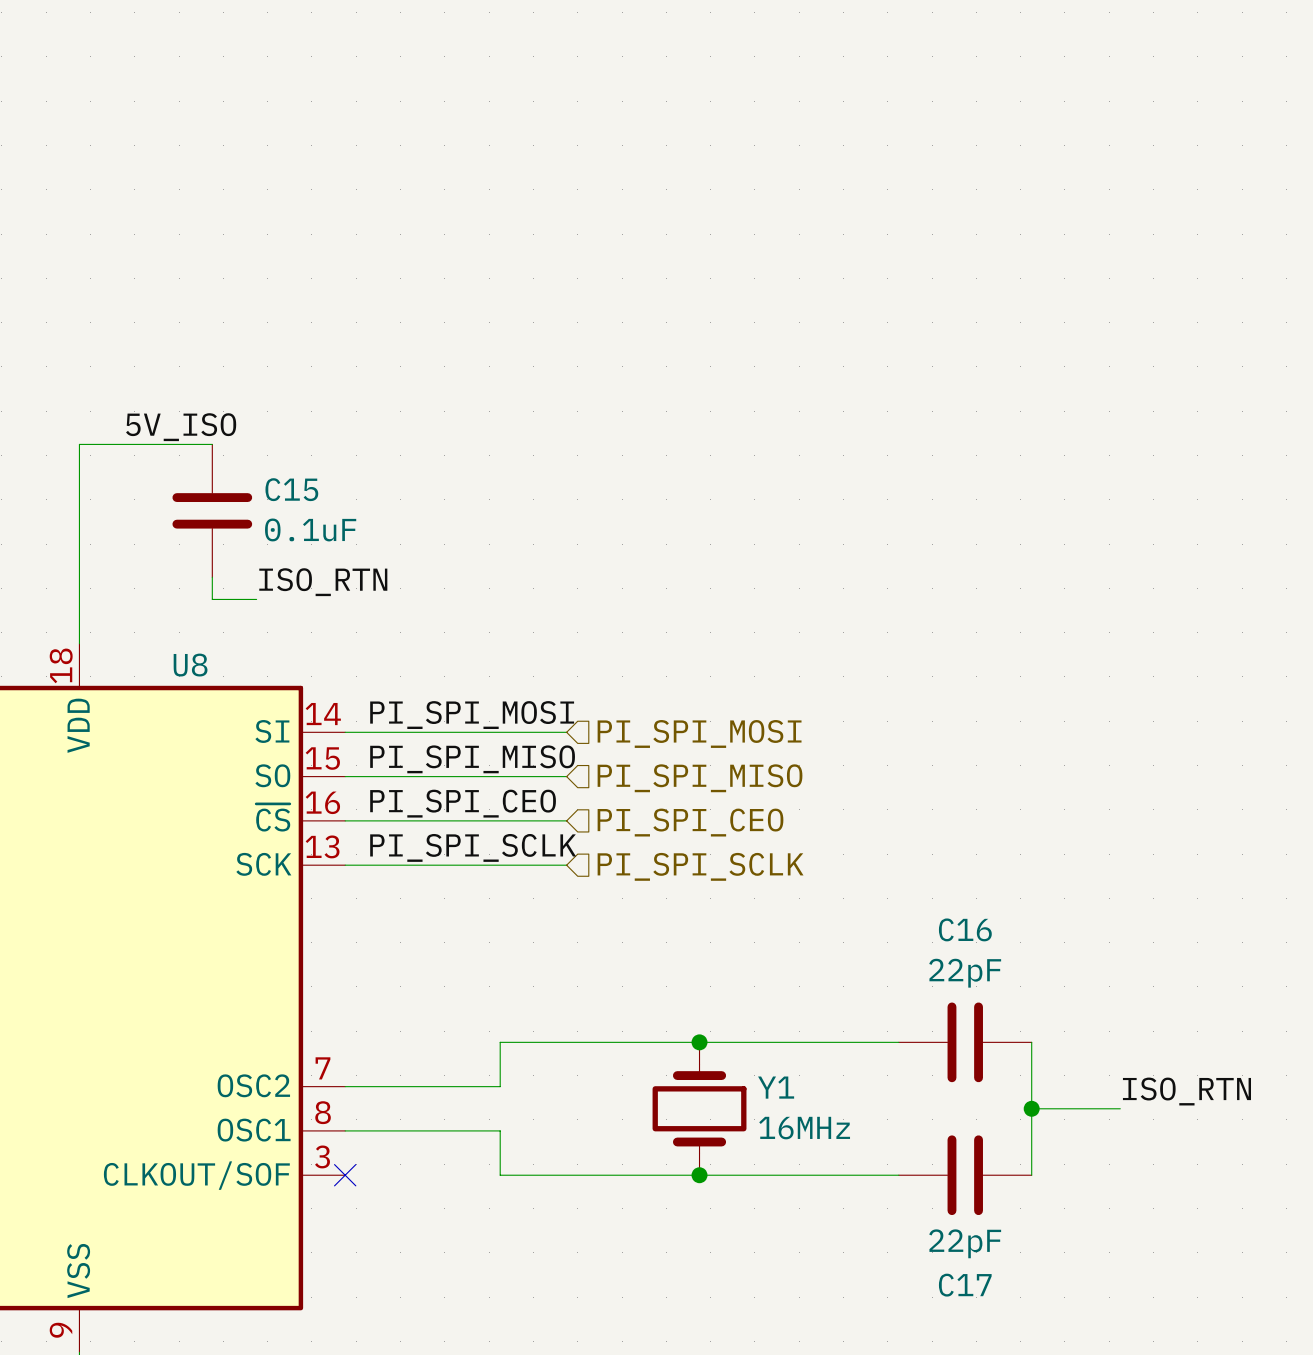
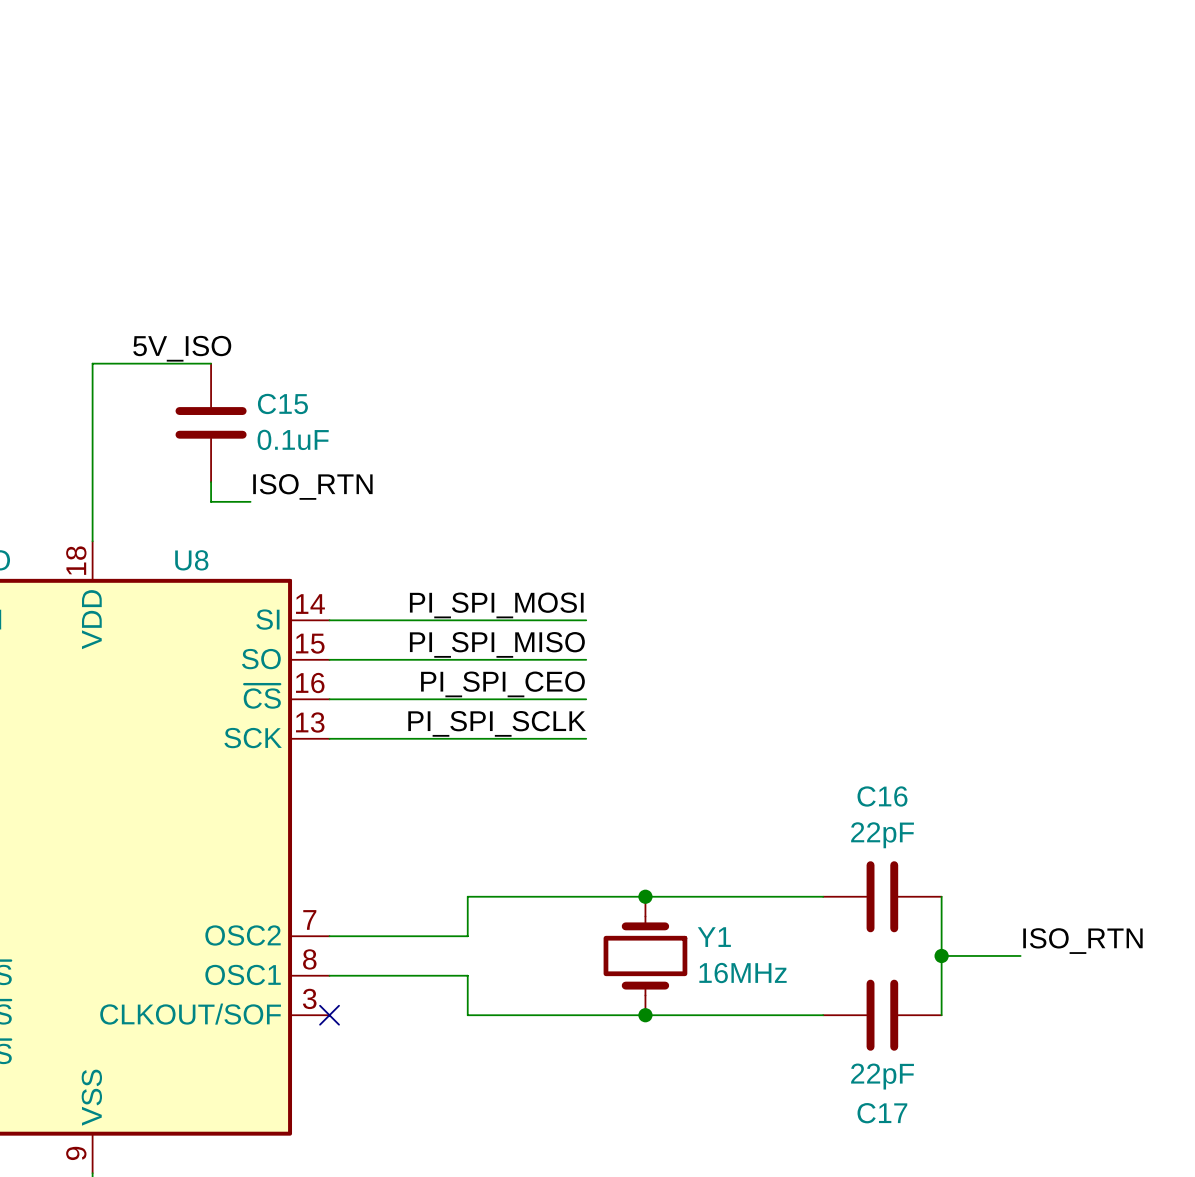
label position: PI_SPI_MOSI (472, 715) -> PI_SPI_MOSI (496, 605)
wire: none -> (526, 620) (586, 620)
hierarchical label: PI_SPI_MOSI (699, 733) -> none
label position: PI_SPI_MISO (472, 759) -> PI_SPI_MISO (497, 644)
wire: none -> (526, 659) (586, 659)
hierarchical label: PI_SPI_MISO (700, 778) -> none
label position: PI_SPI_CEO (463, 803) -> PI_SPI_CEO (502, 684)
wire: none -> (526, 699) (586, 699)
hierarchical label: PI_SPI_CEO (690, 822) -> none
label position: PI_SPI_SCLK (473, 847) -> PI_SPI_SCLK (497, 723)
wire: none -> (526, 738) (586, 738)
hierarchical label: PI_SPI_SCLK (700, 866) -> none

